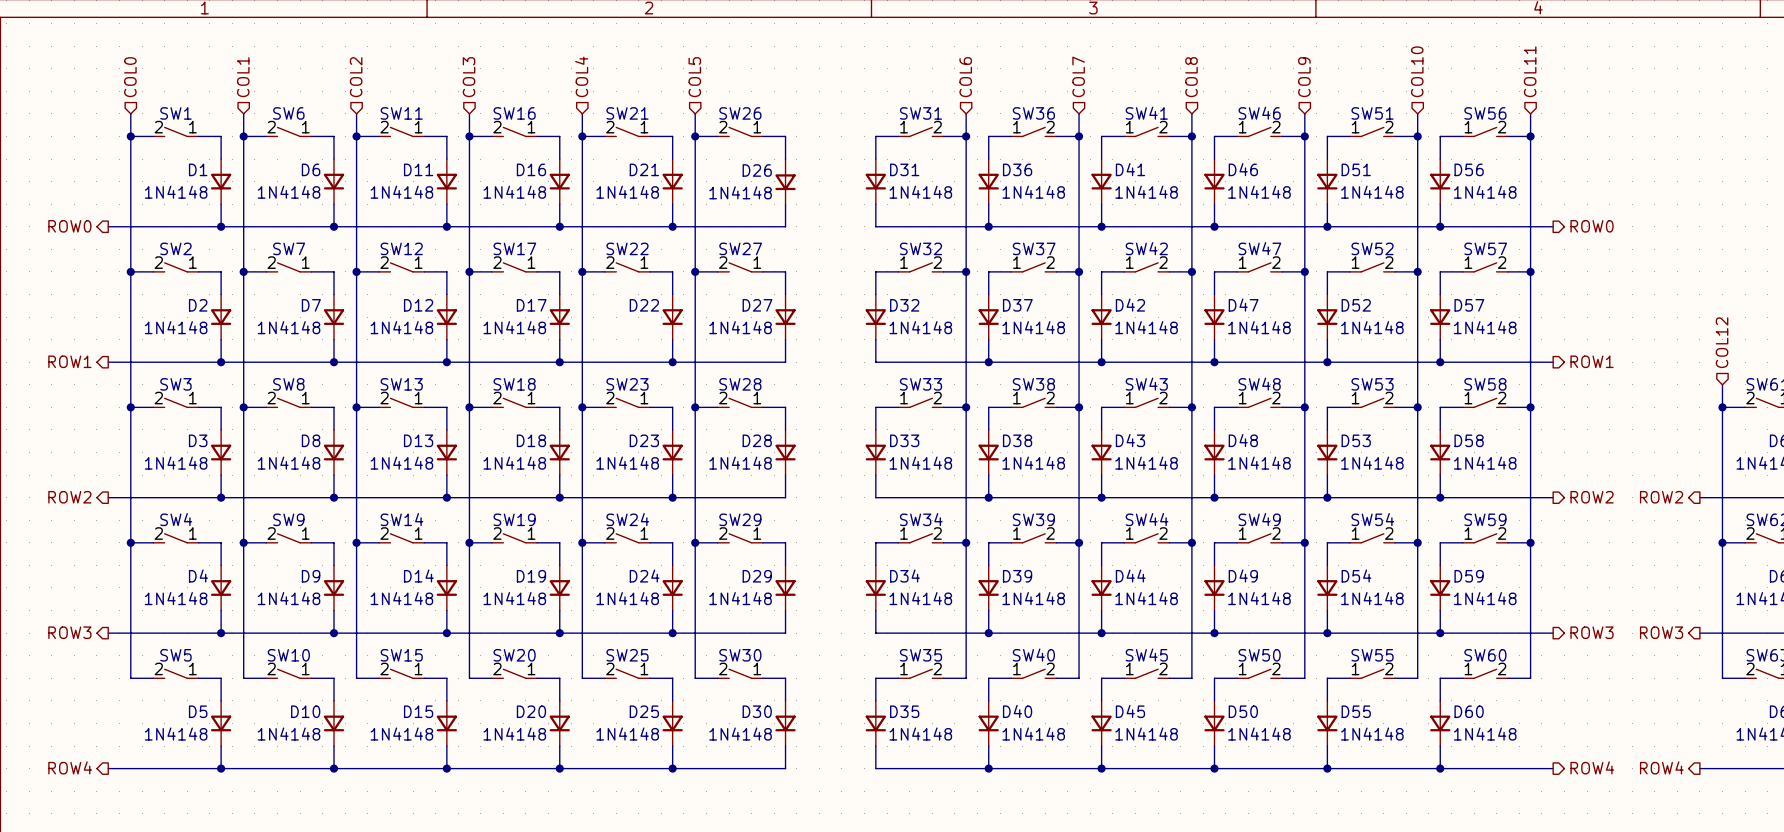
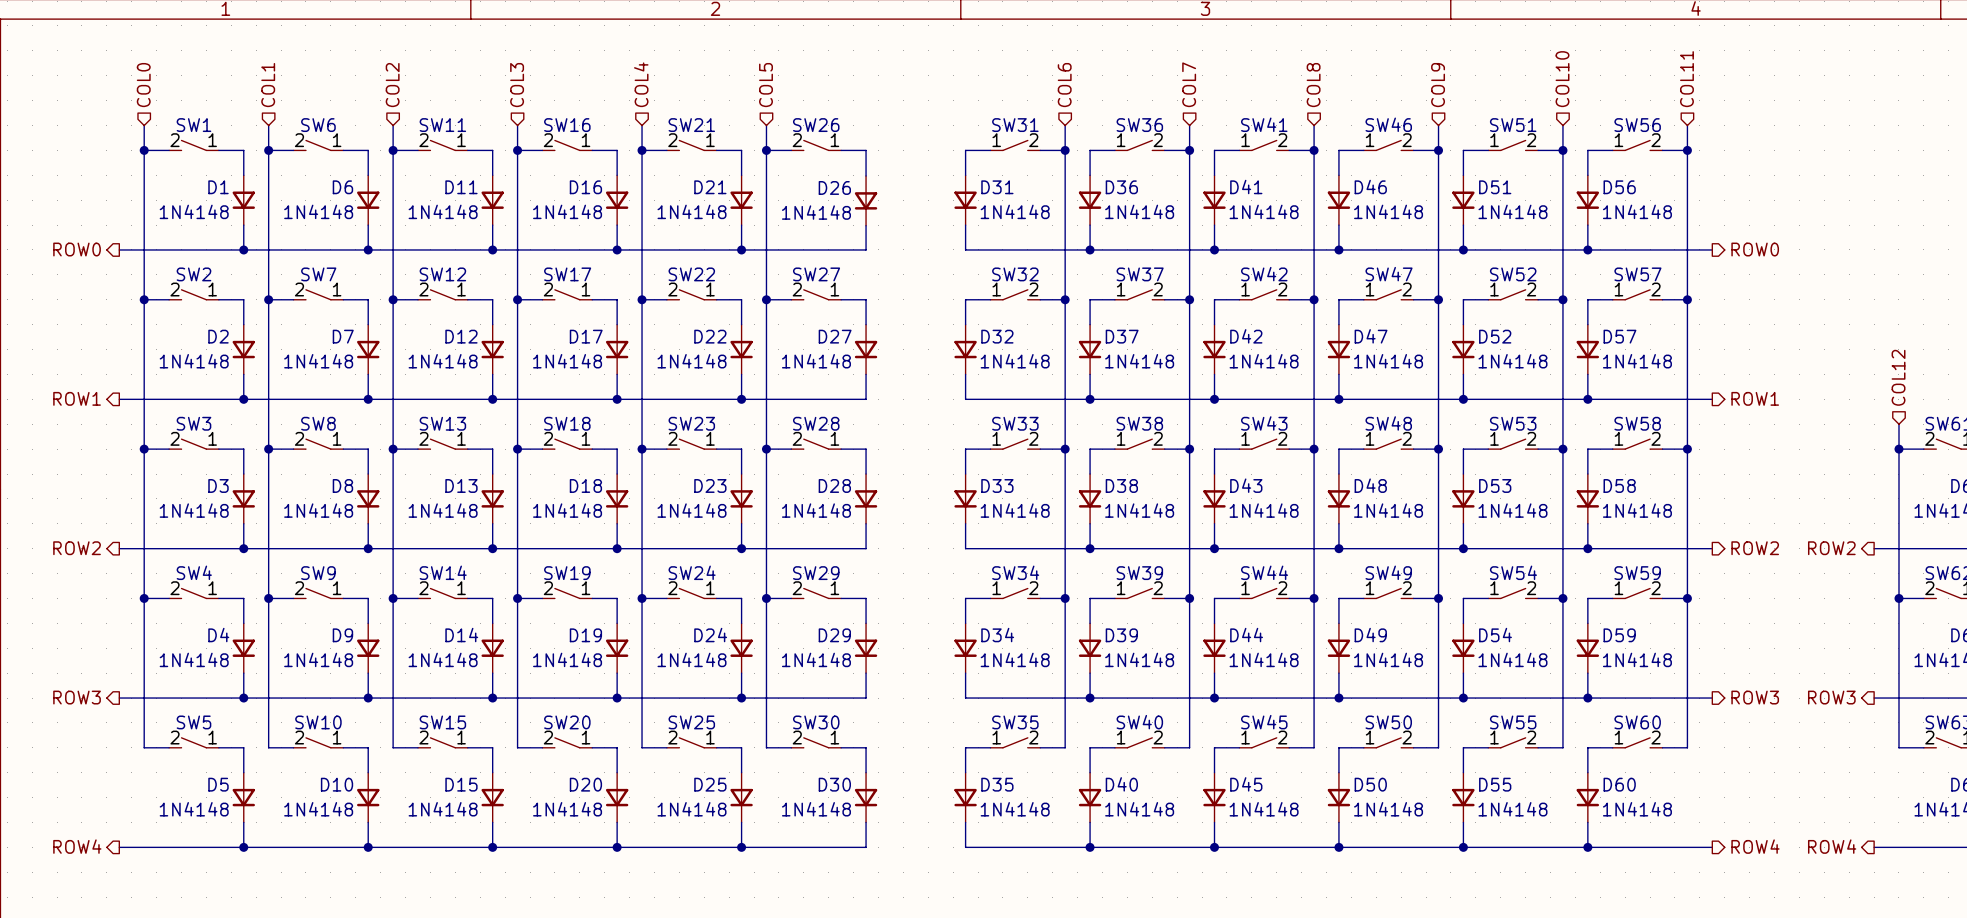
D22 value: none -> 1N4148 (692, 361)

